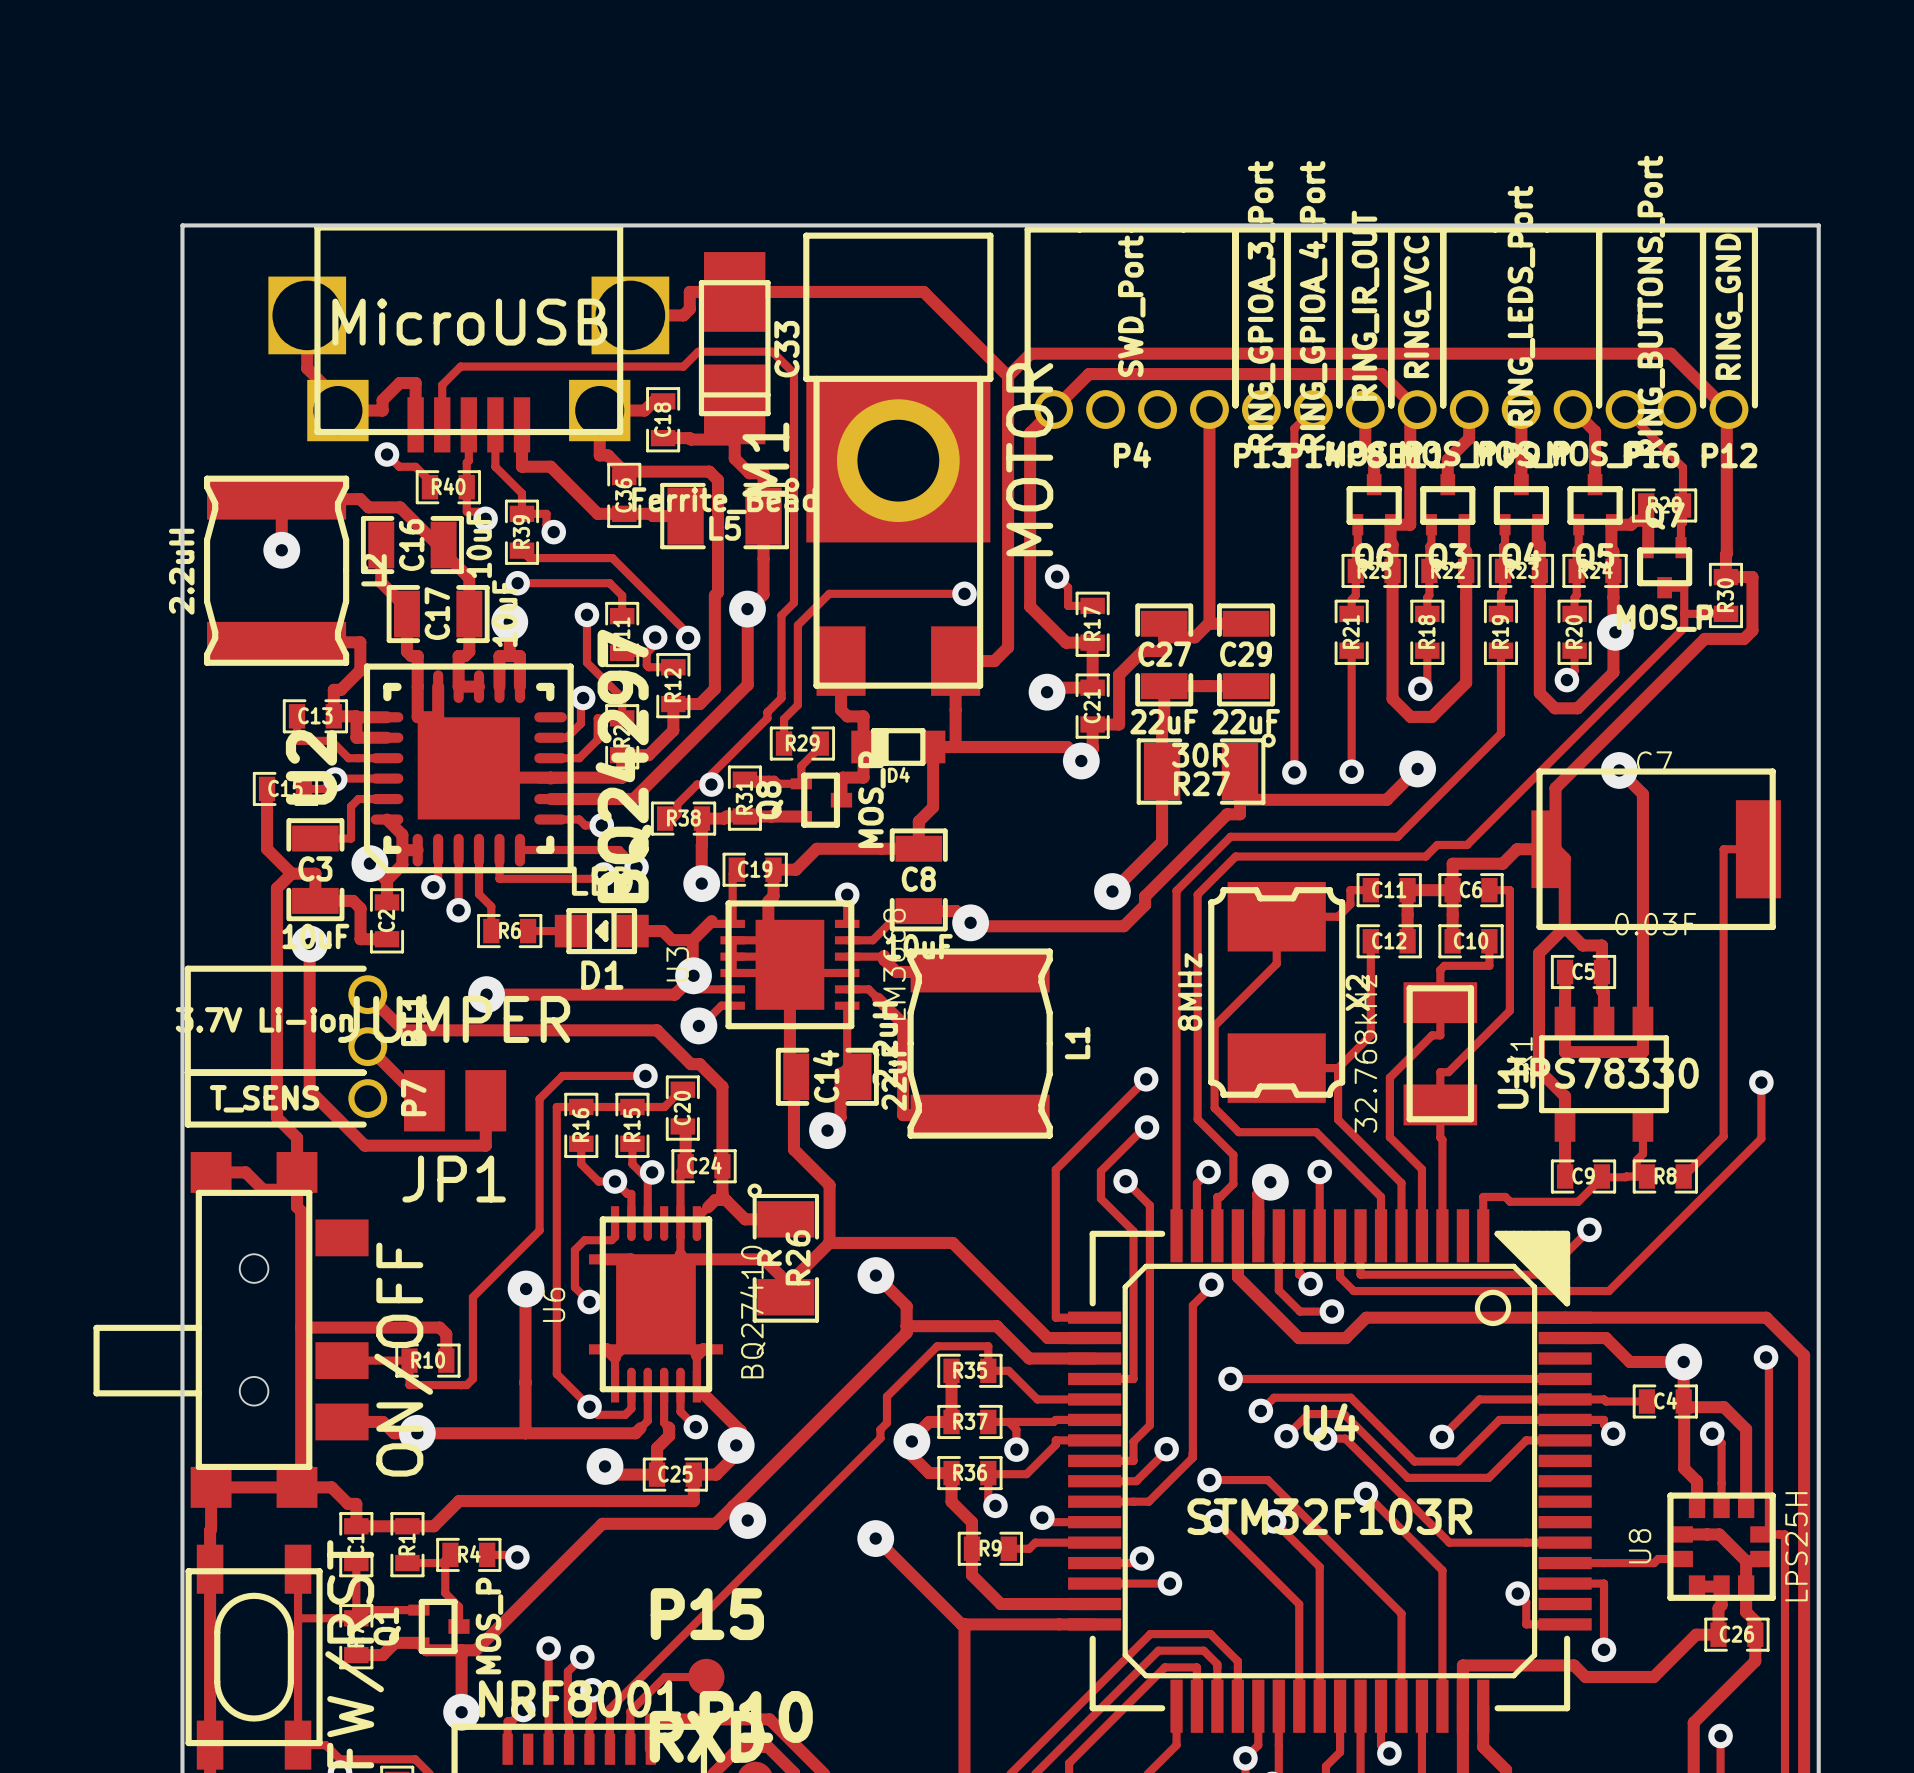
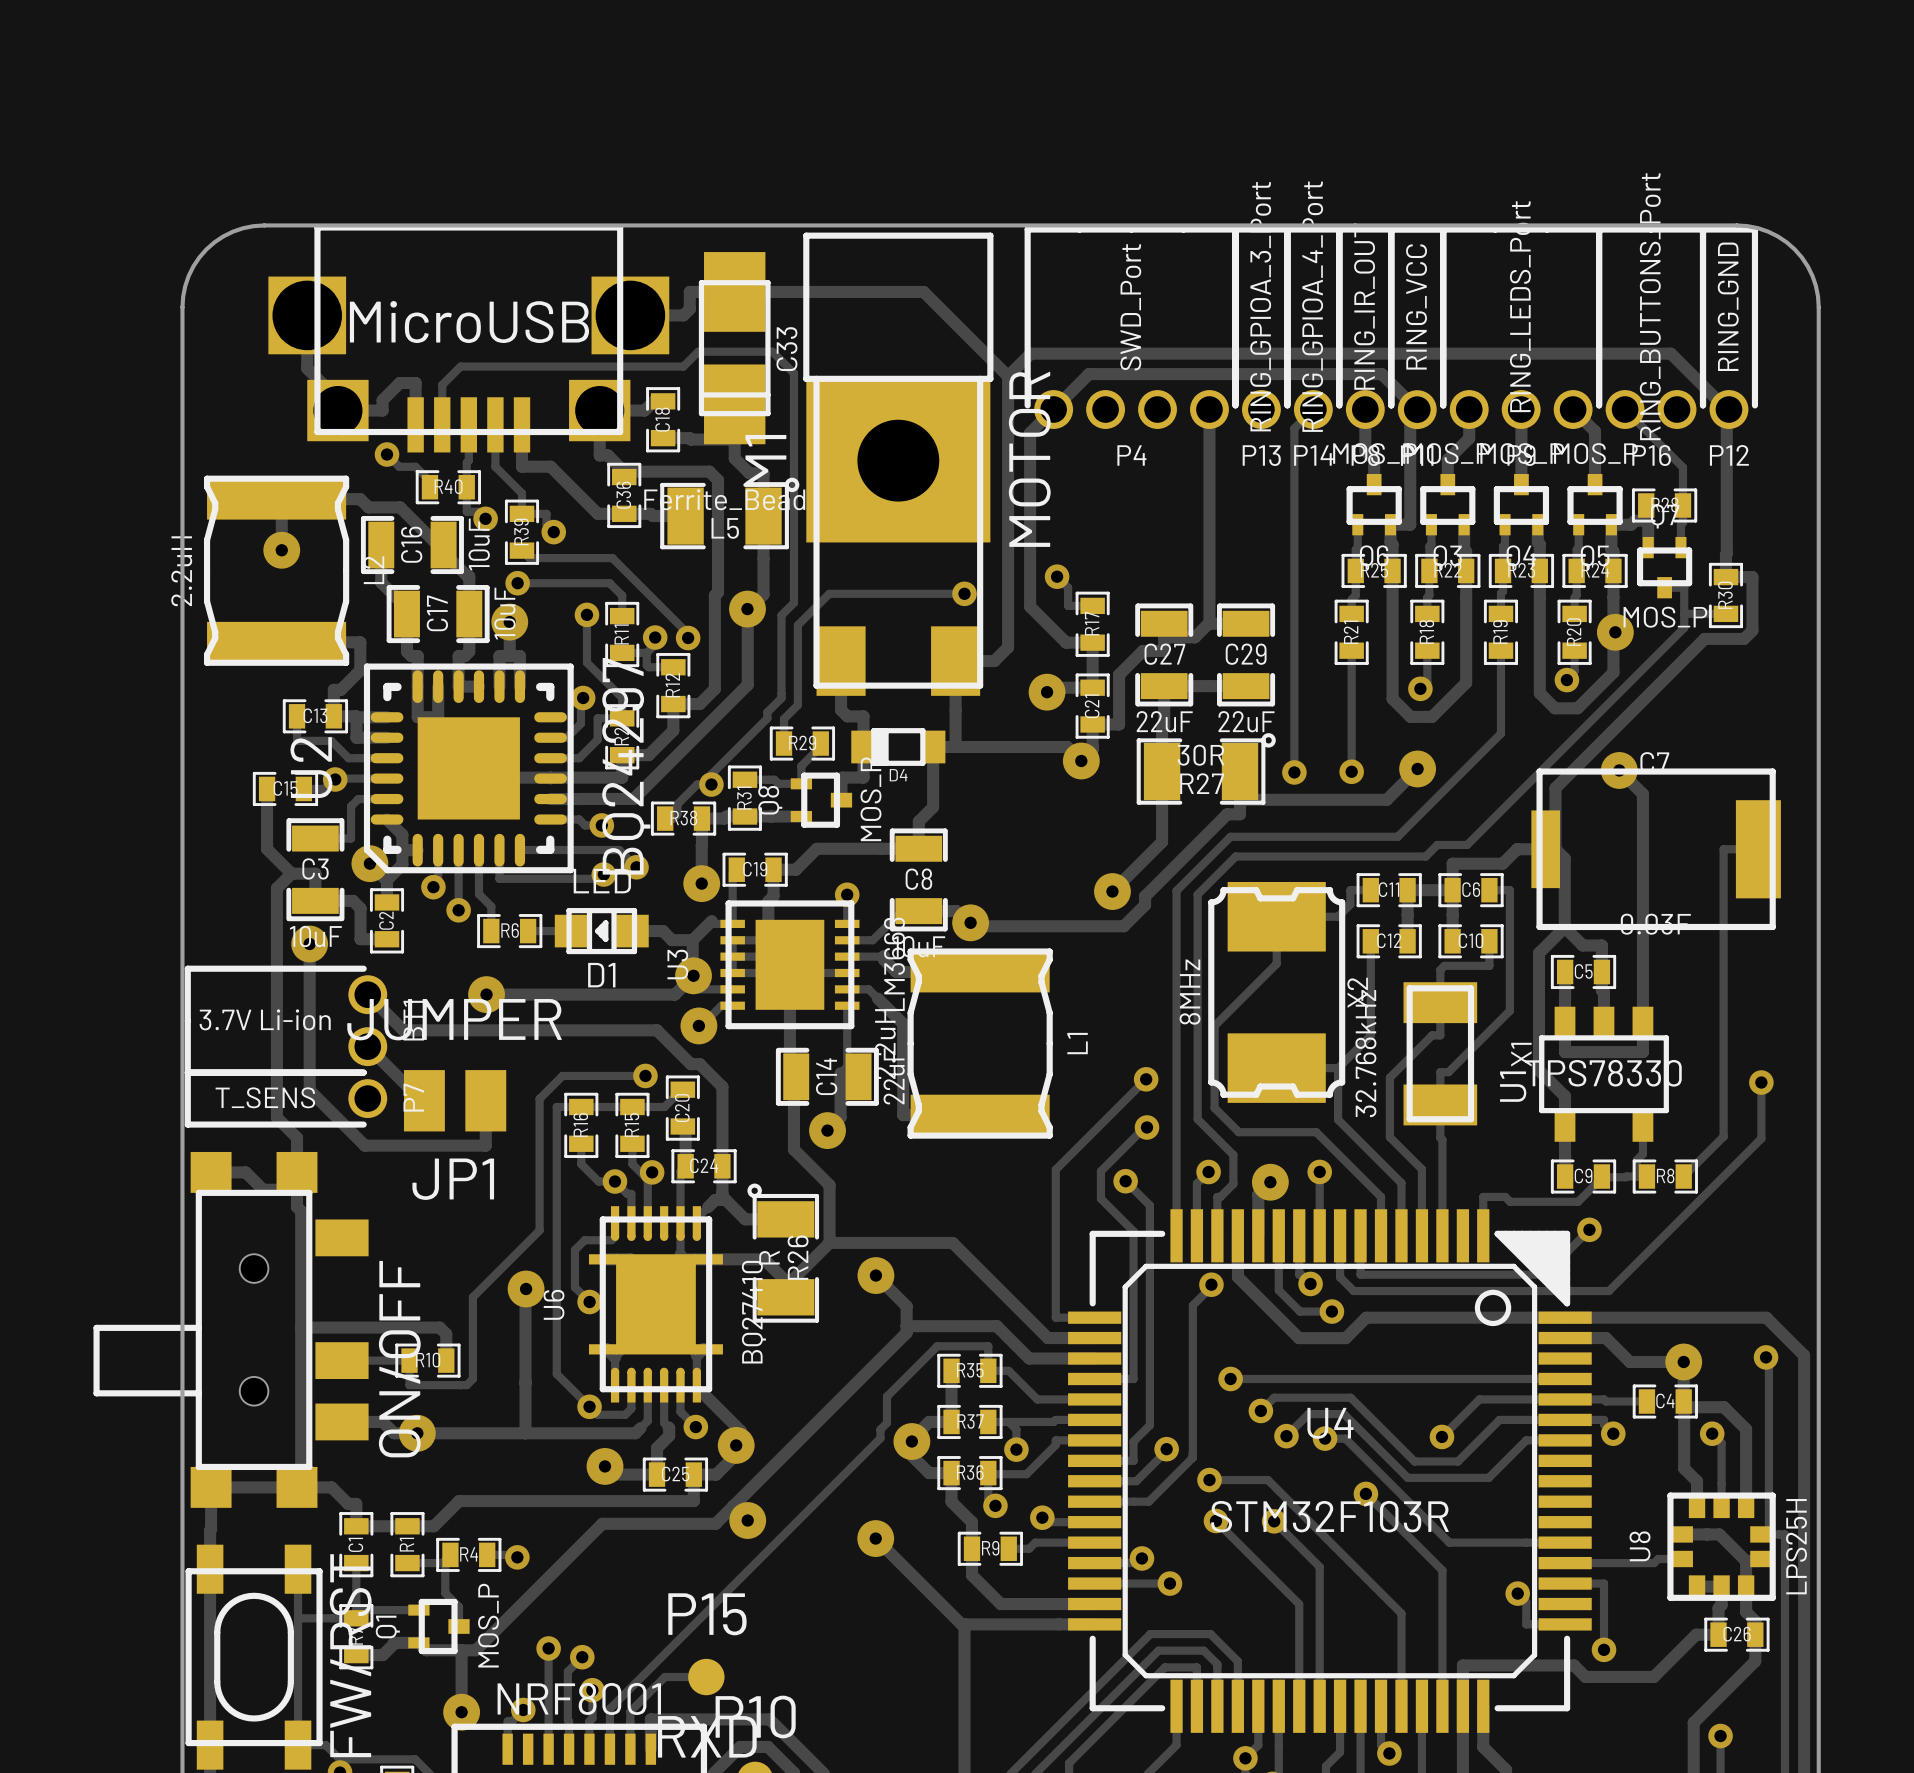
board edge: (264, 225) (182, 225) (182, 307) -> (264, 225) (232, 231) (206, 249) (188, 275) (182, 307)
board edge: (1736, 225) (1818, 225) (1818, 307) -> (1736, 225) (1768, 231) (1794, 249) (1812, 275) (1818, 307)

